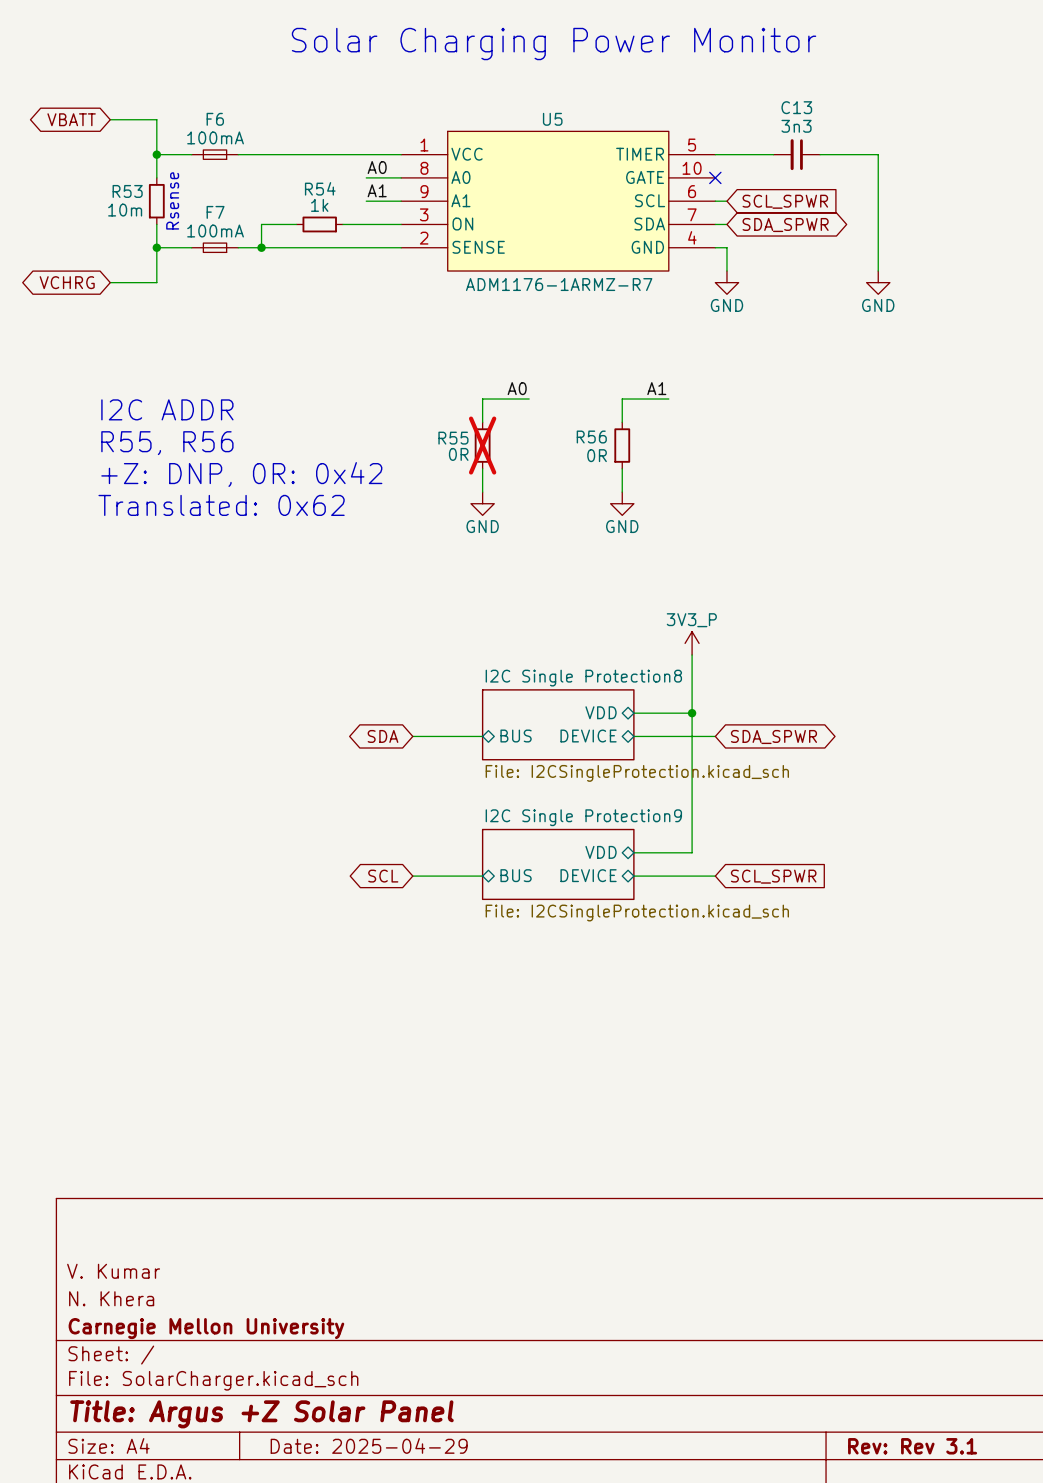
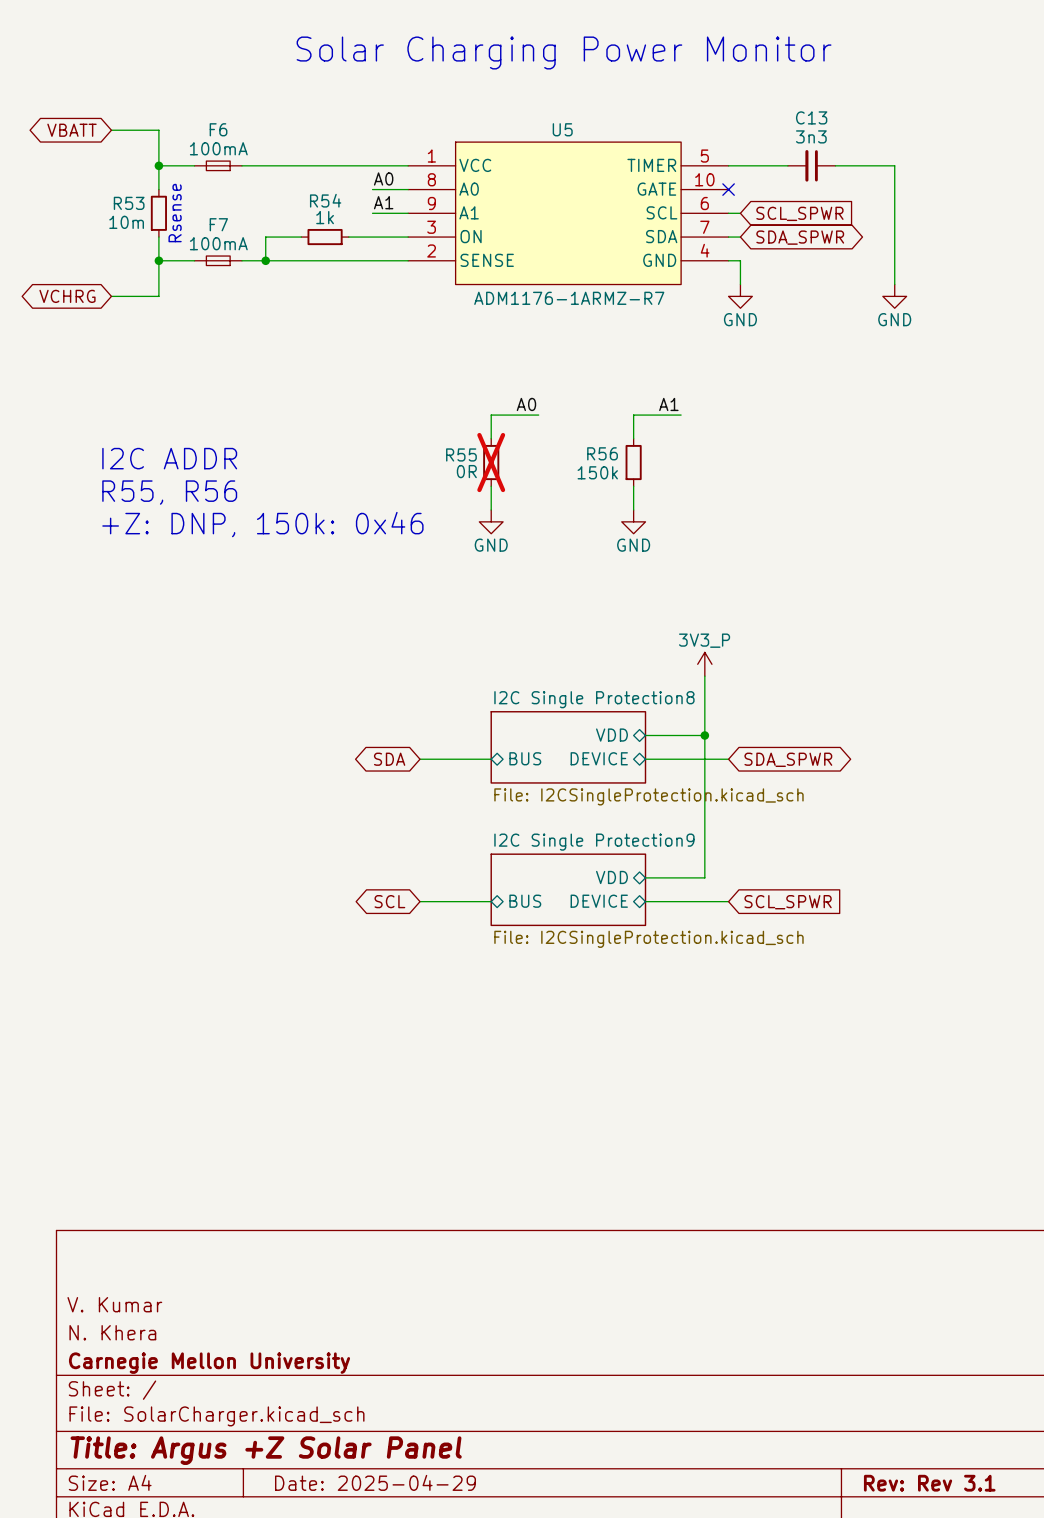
text: I2C ADDR (167, 409) -> none
text: R55, R56 (167, 443) -> I2C ADDR (169, 458)
R56 value: 0R (597, 455) -> 150k (597, 472)
text: +Z: DNP, 0R: 0x42 (241, 474) -> R55, R56 (169, 492)
text: Translated: 0x62 (221, 505) -> +Z: DNP, 150k: 0x46 (262, 524)

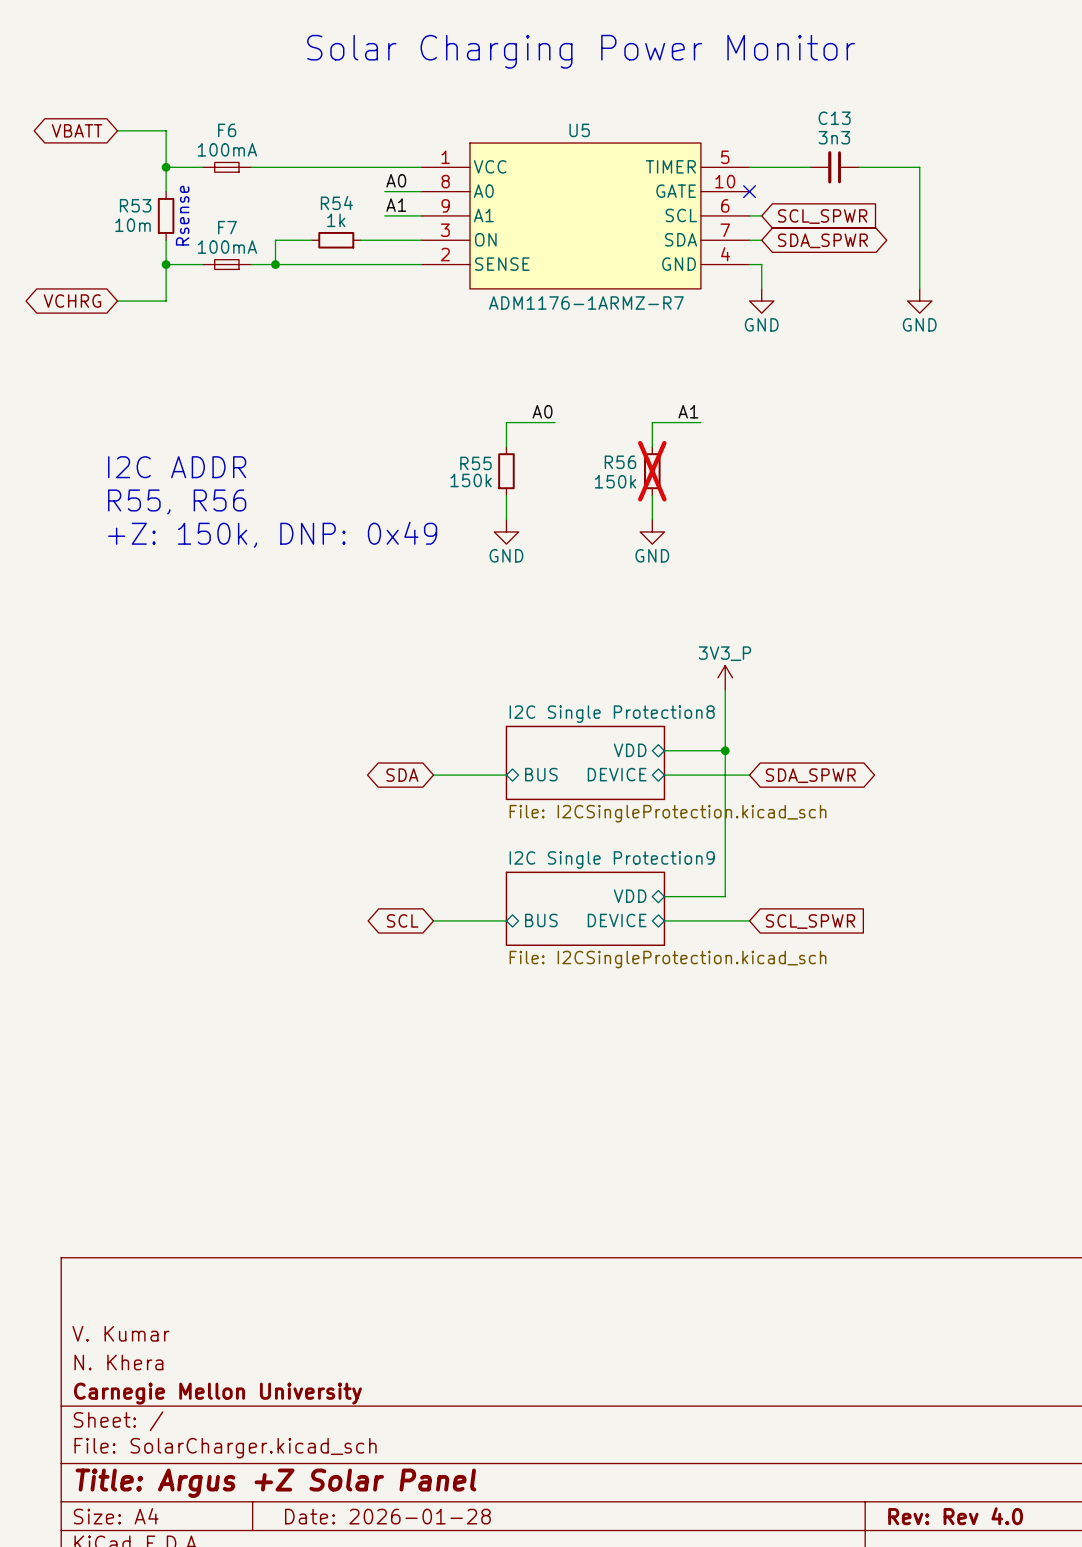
R55 do-not-place cross: (491, 462) -> none
R56 do-not-place cross: none -> (652, 471)
R55 value: 0R (466, 471) -> 150k (471, 480)
text: +Z: DNP, 150k: 0x46 (262, 524) -> +Z: 150k, DNP: 0x49 (272, 534)
title block: Date: 2025-04-29 (375, 1482) -> Date: 2026-01-28 (387, 1516)
title block: Rev: Rev 3.1 (929, 1483) -> Rev: Rev 4.0 (955, 1516)

